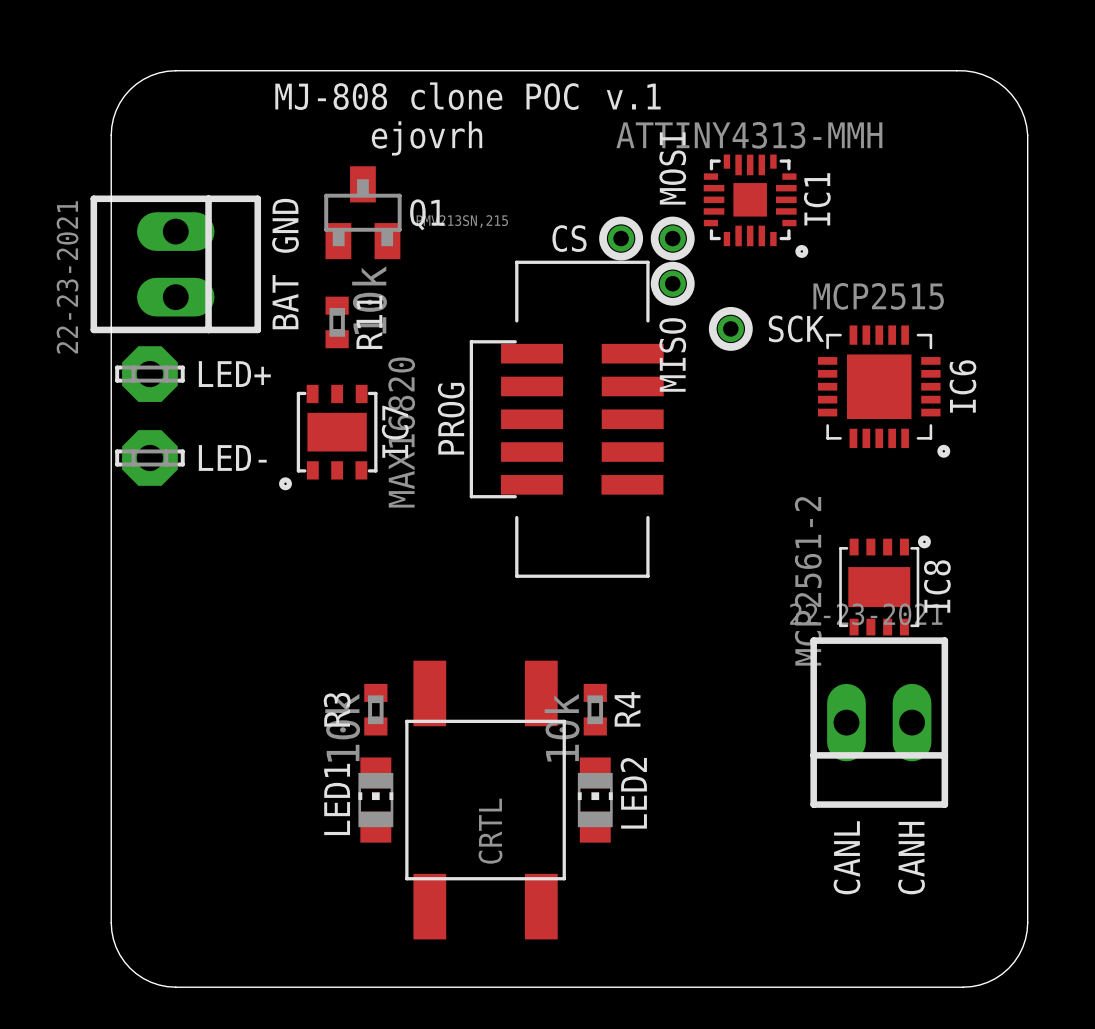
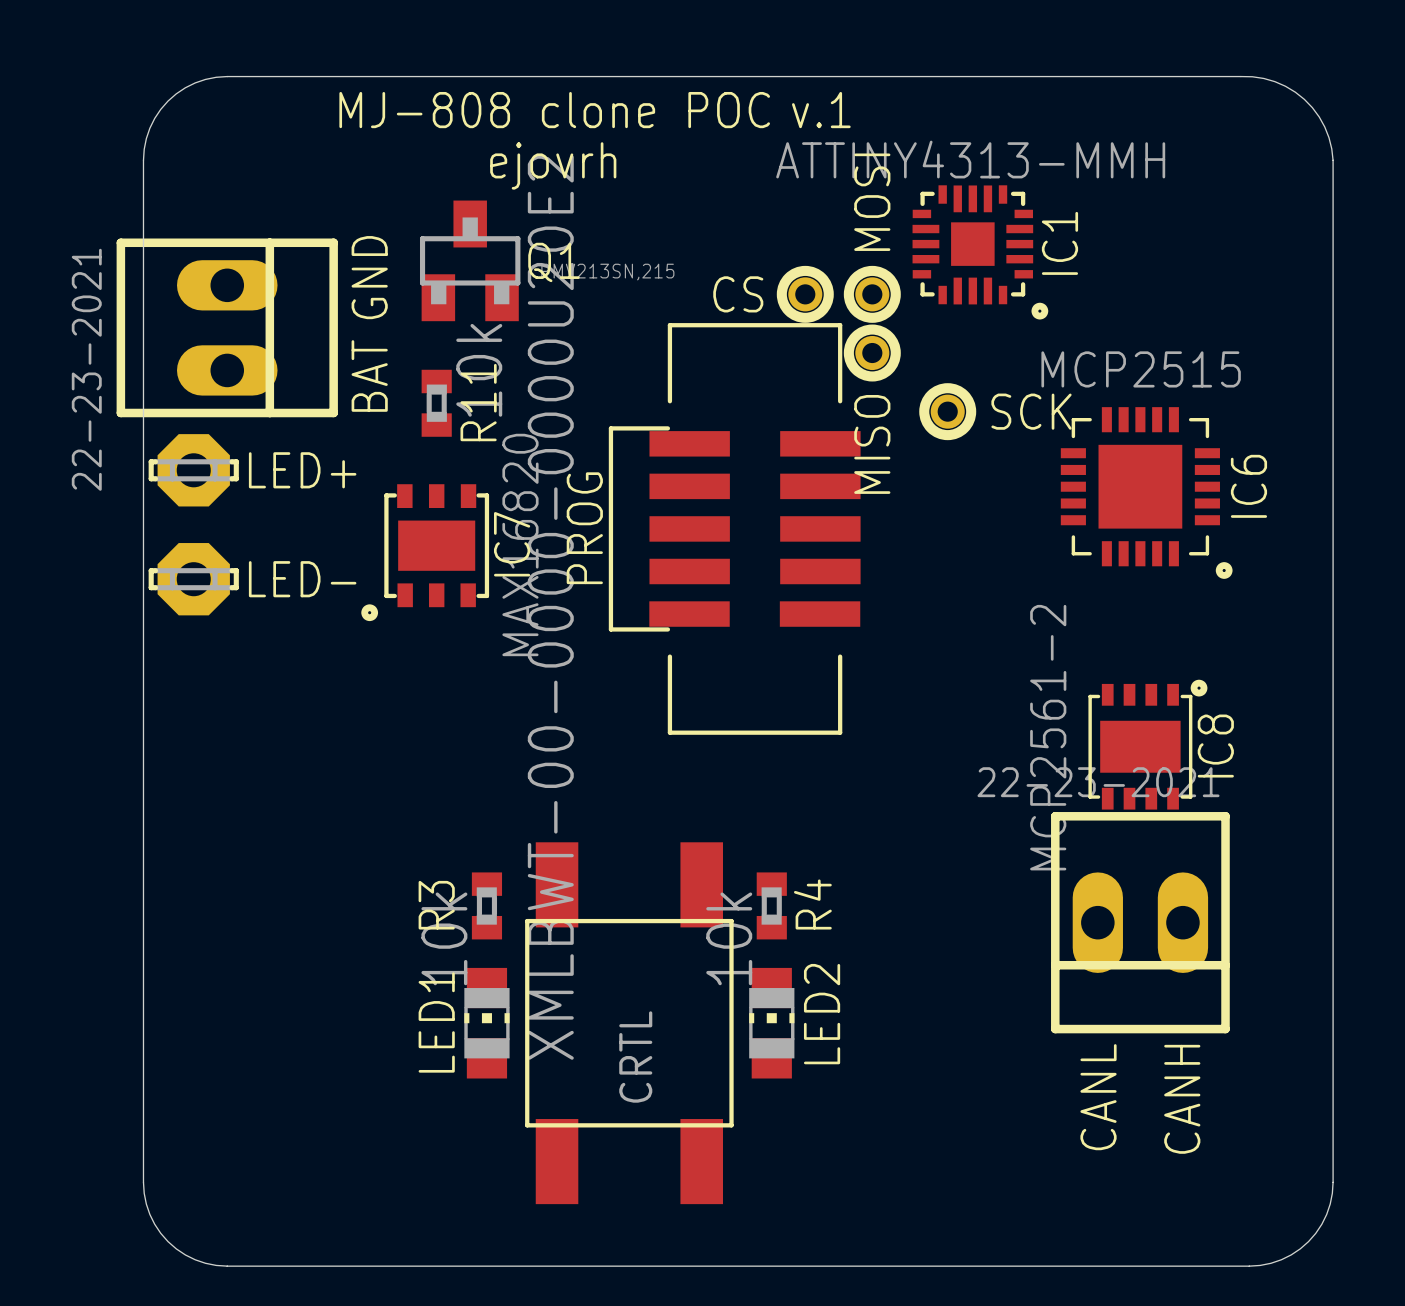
LED1 value: none -> XMLBWT-00-0000-0000U20E2 (550, 607)

